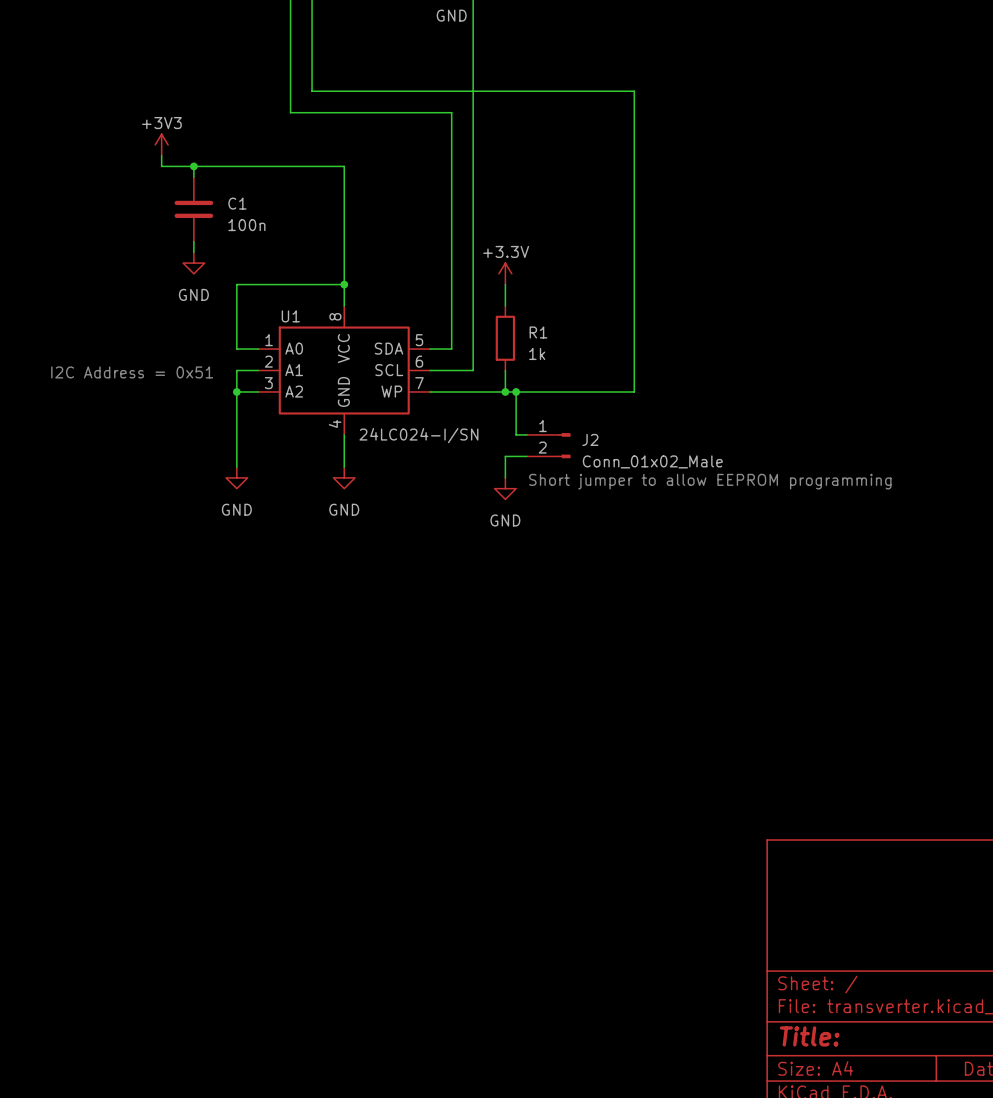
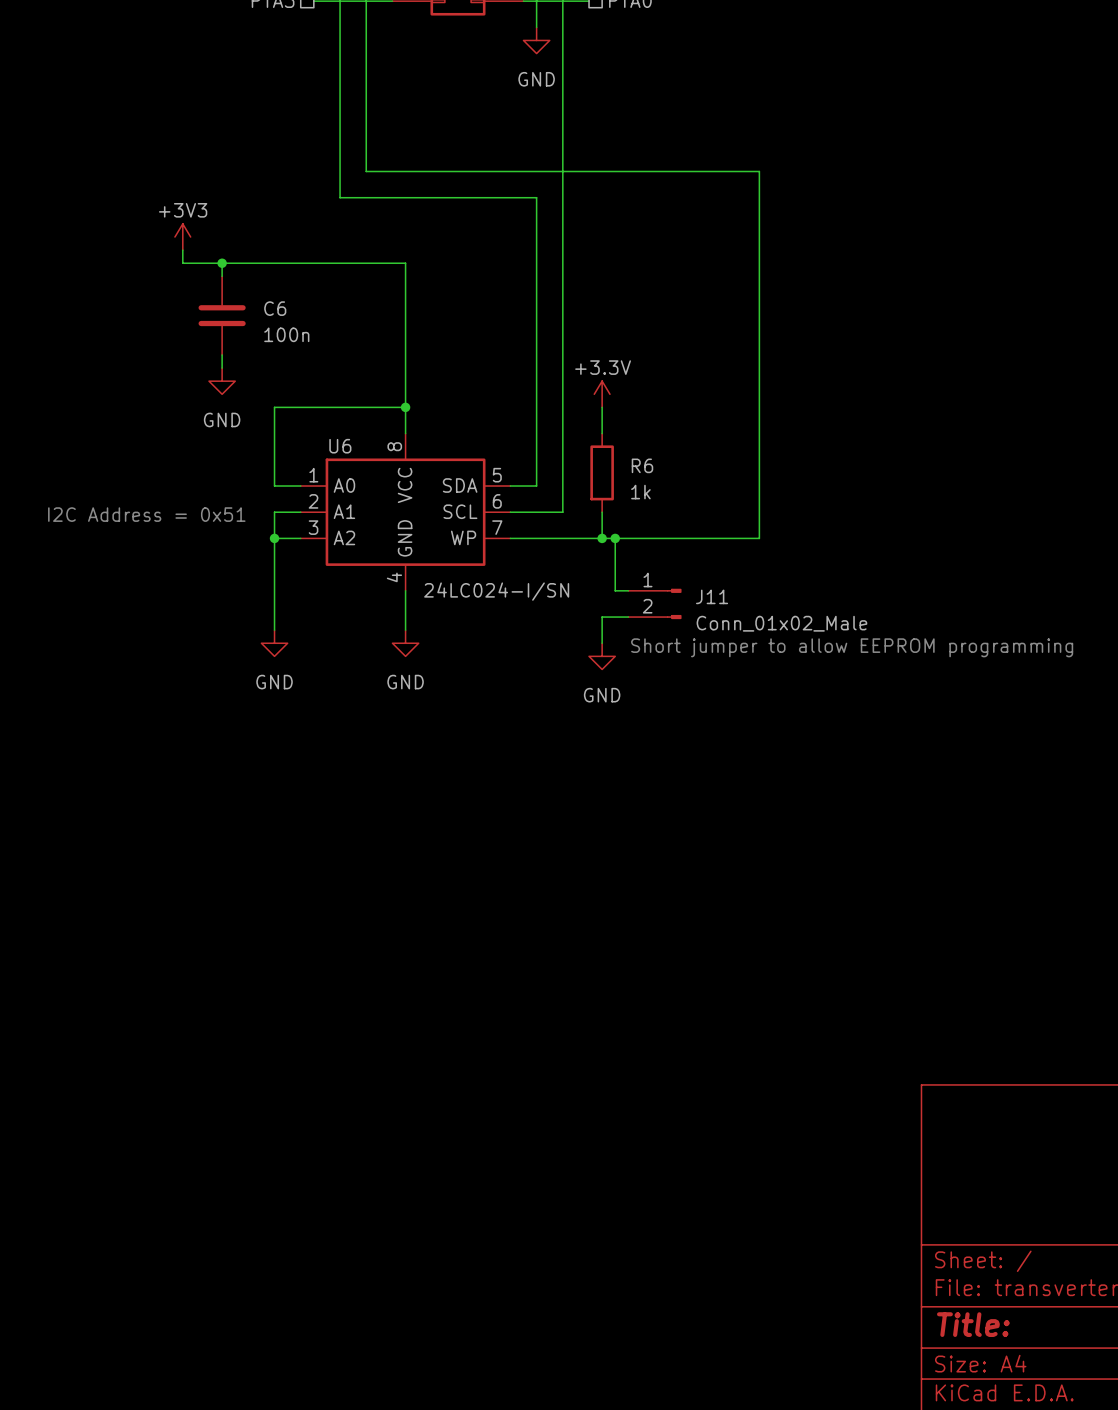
C1 name: C1 (237, 203) -> C6 (275, 308)
U1 name: U1 (290, 316) -> U6 (340, 446)
R1 name: R1 (538, 332) -> R6 (642, 465)
J2 name: J2 (590, 439) -> J11 (712, 596)

